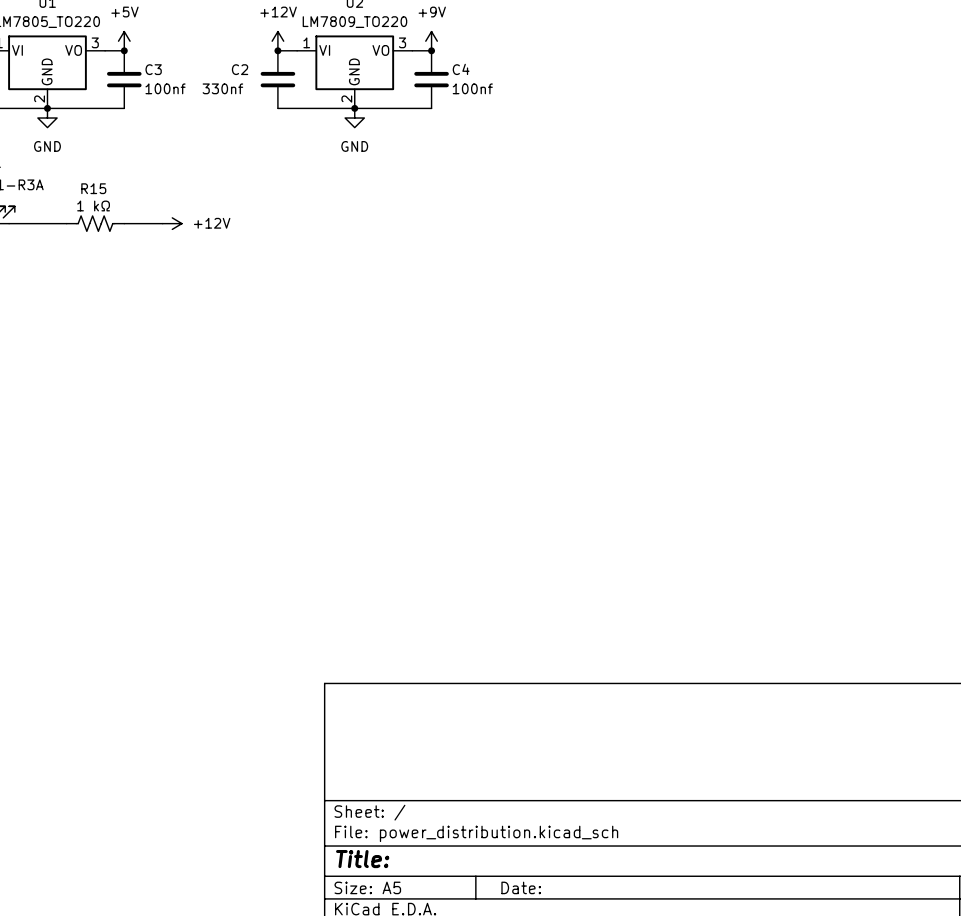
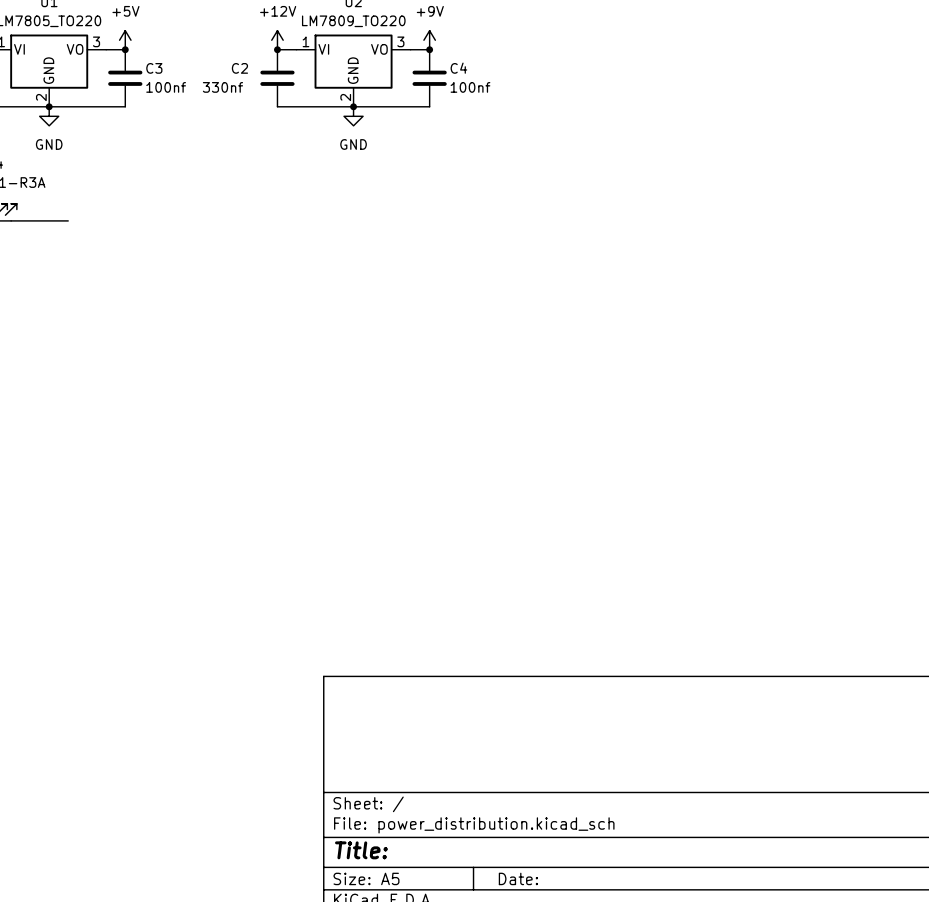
R15: 1 kΩ (95, 223) -> none
wire: (124, 223) (162, 223) -> none
power symbol: +12V (172, 223) -> none

